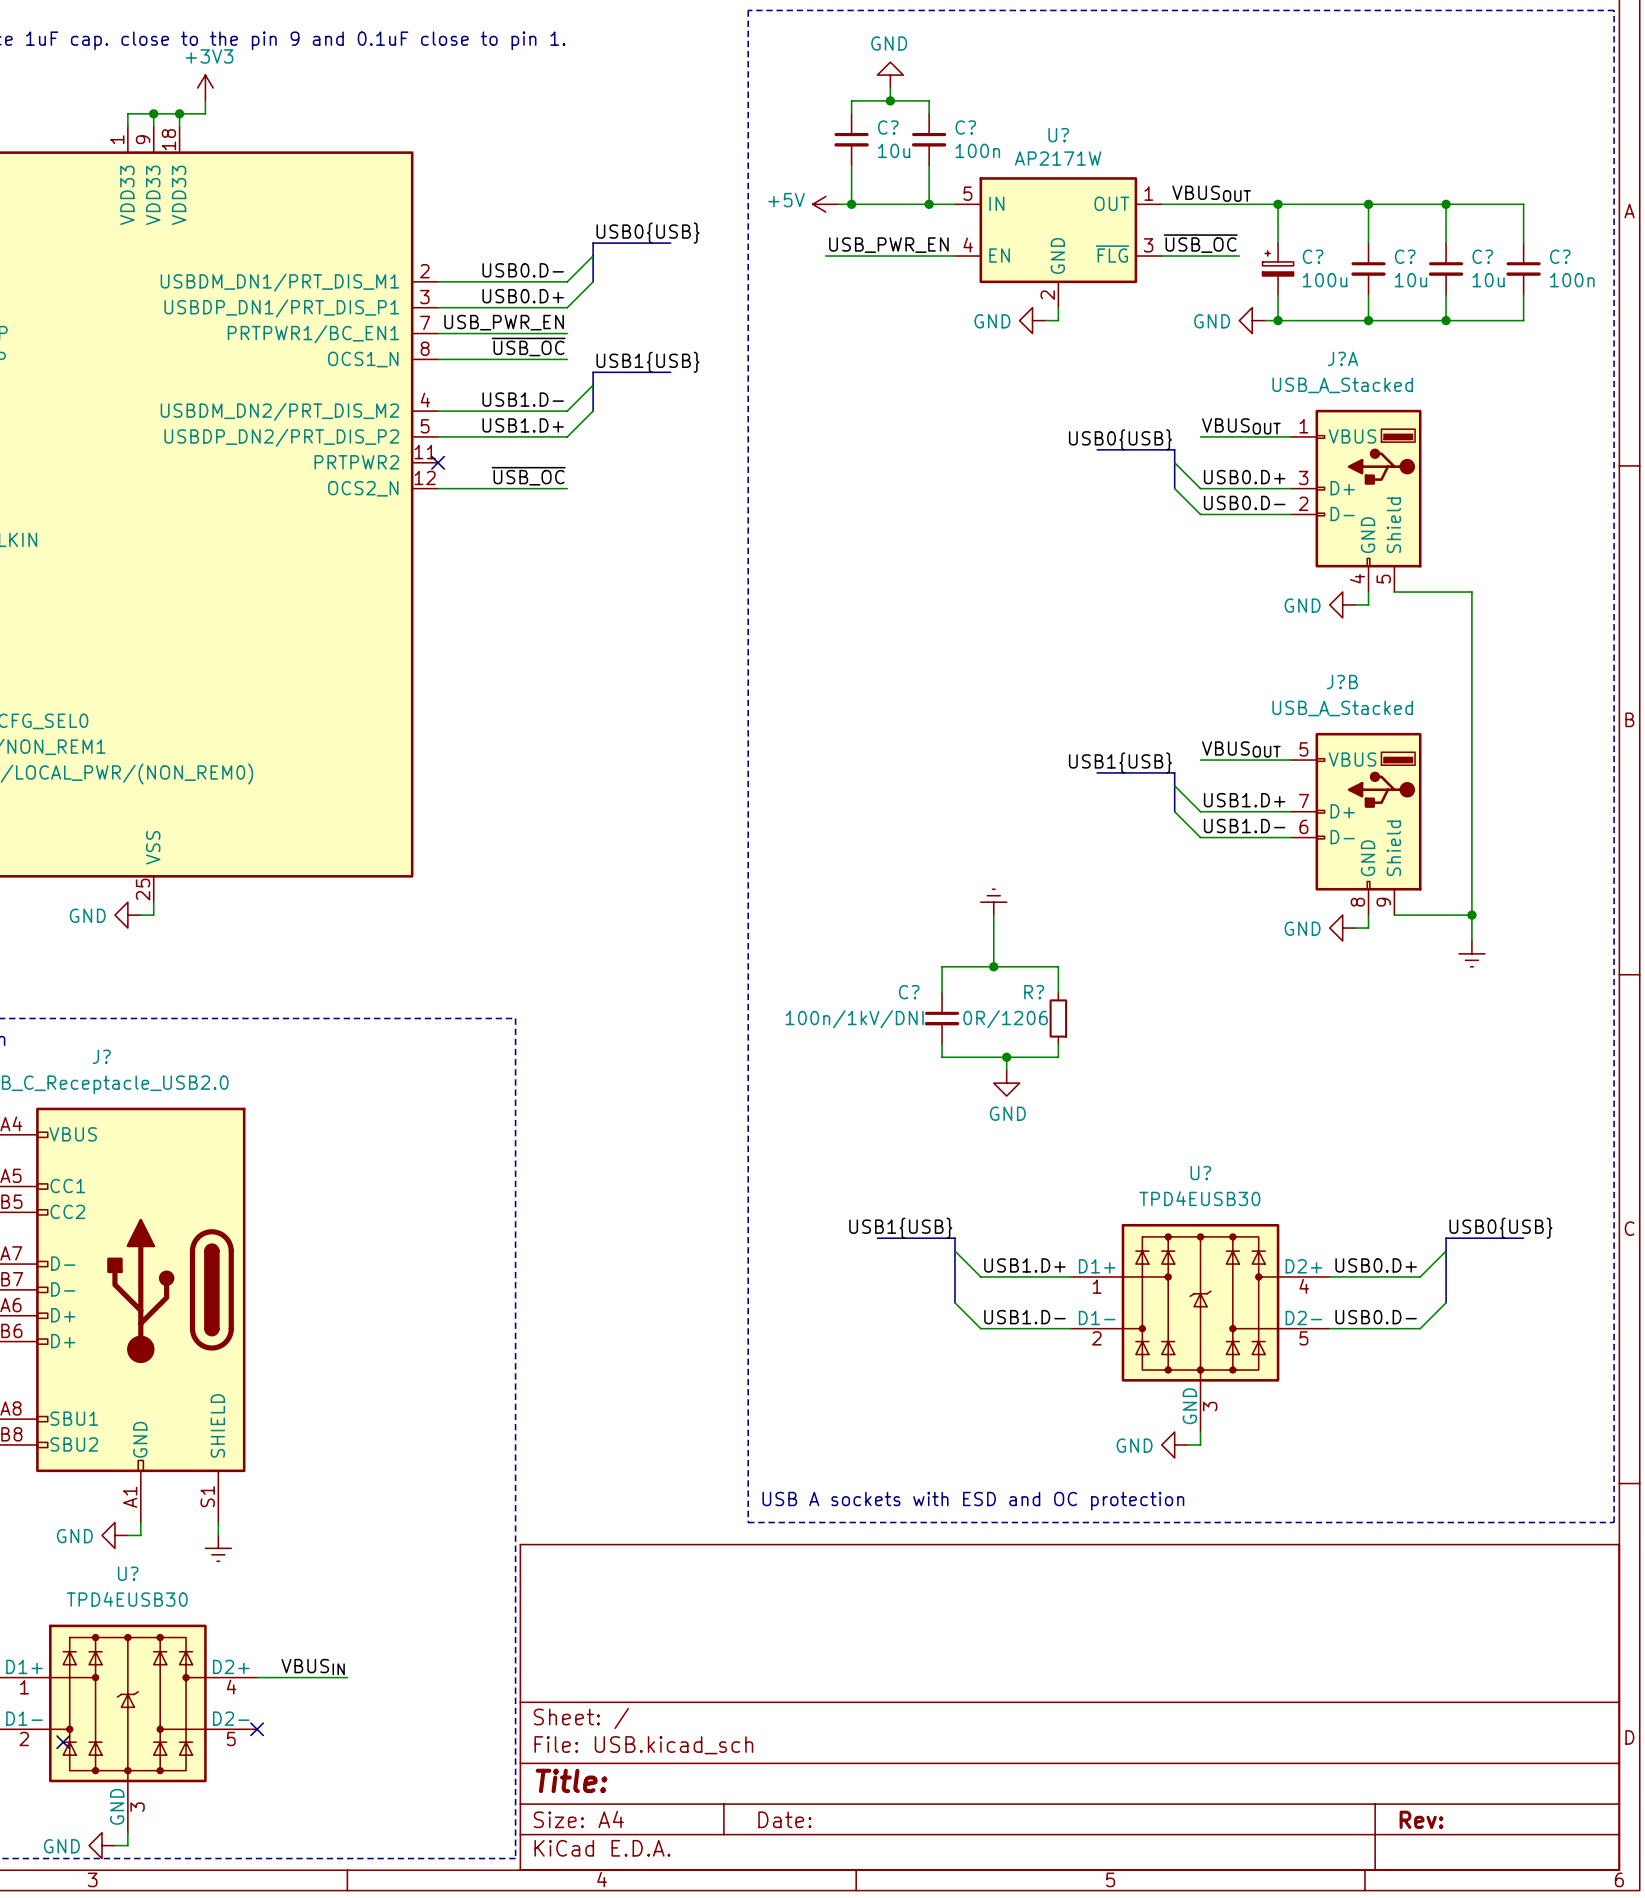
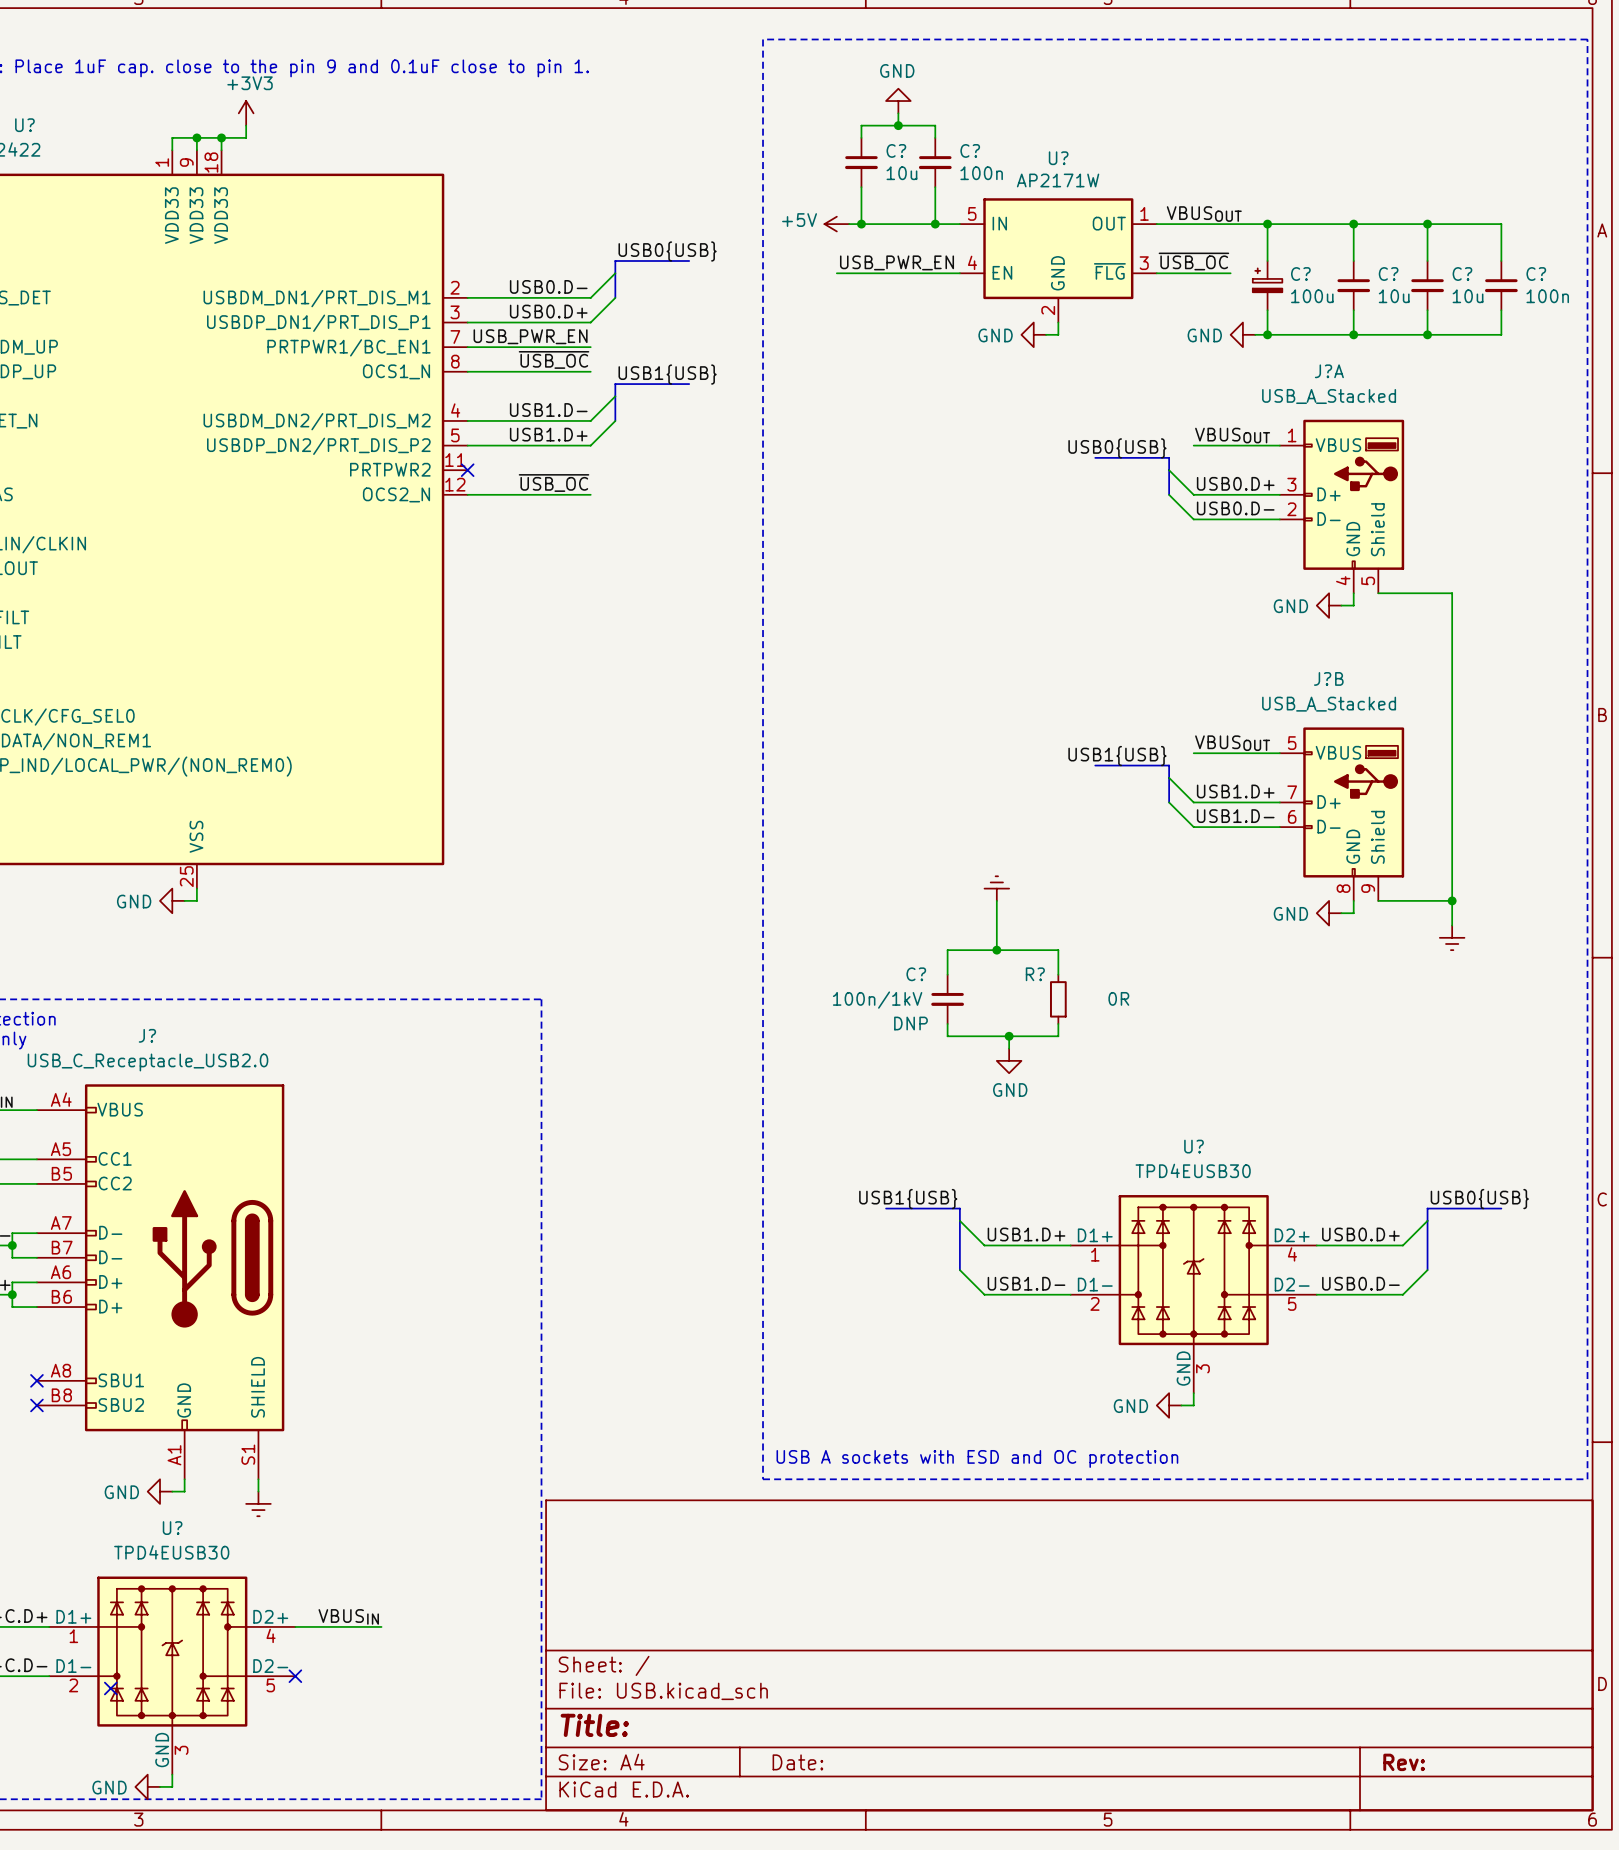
C? value: 100n/1kV/DNI (854, 1019) -> 100n/1kV (877, 1000)
R? value: 0R/1206 (1005, 1019) -> 0R (1118, 998)
C? text: none -> DNP (910, 1023)

